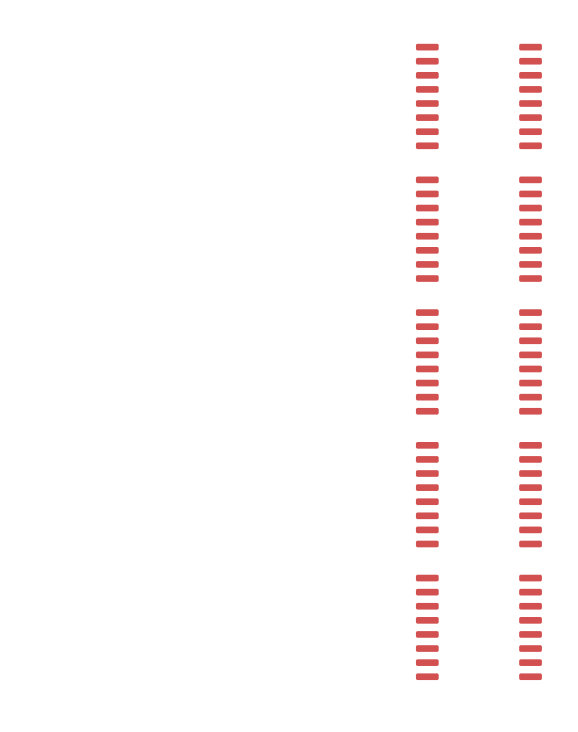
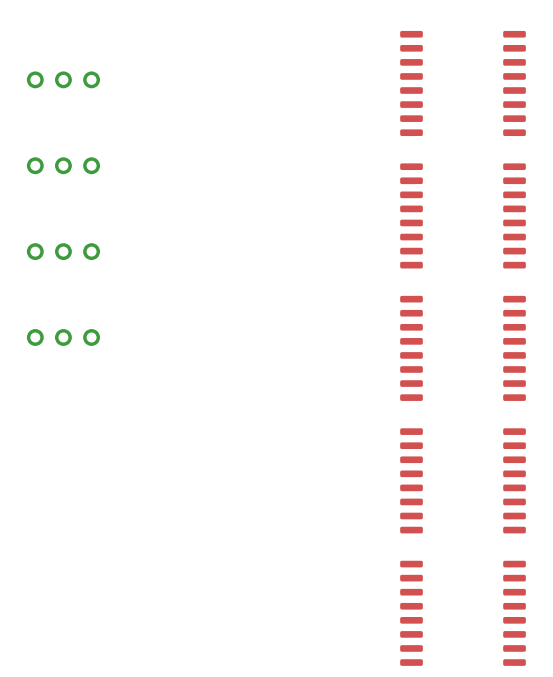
part: none -> (63, 79)
part: none -> (63, 165)
part: none -> (63, 251)
part: none -> (63, 337)

